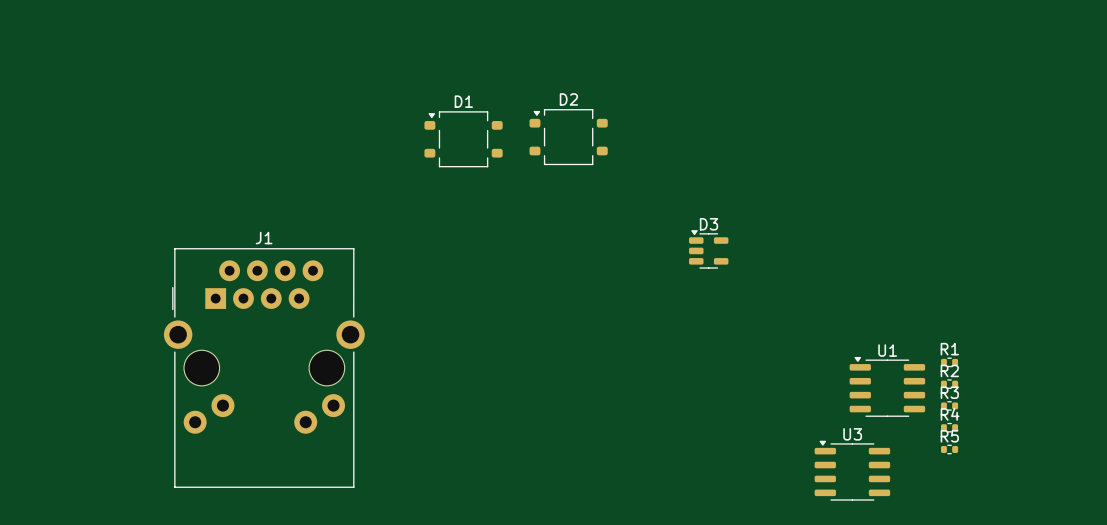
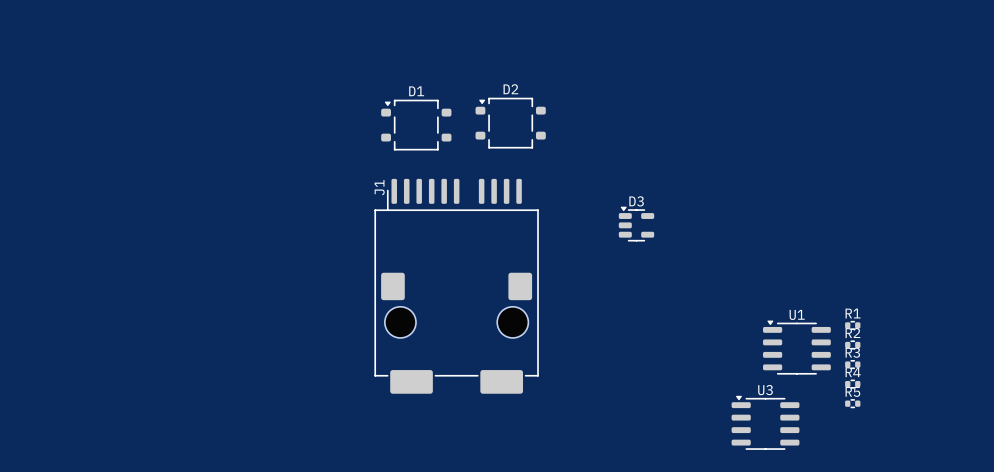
J1 name position: J1 (264, 238) -> J1 (379, 187)
J1 footprint: [163, 248, 365, 488] -> [374, 178, 539, 394]

